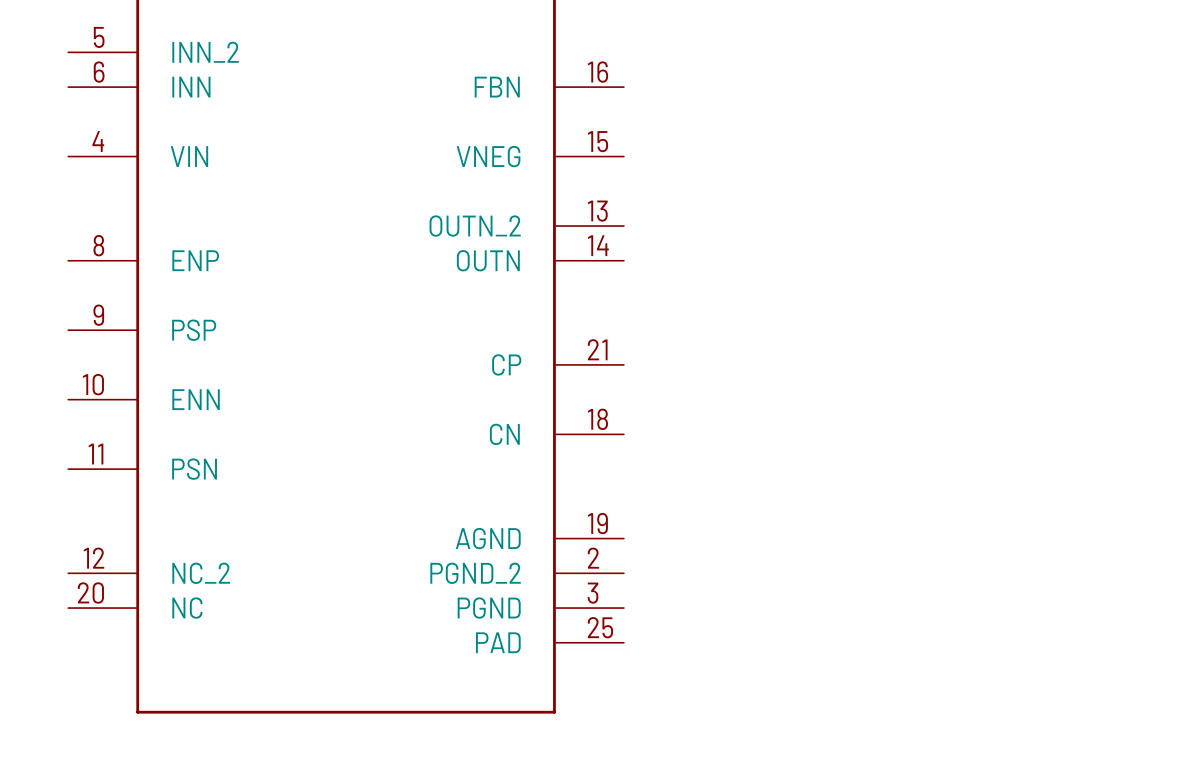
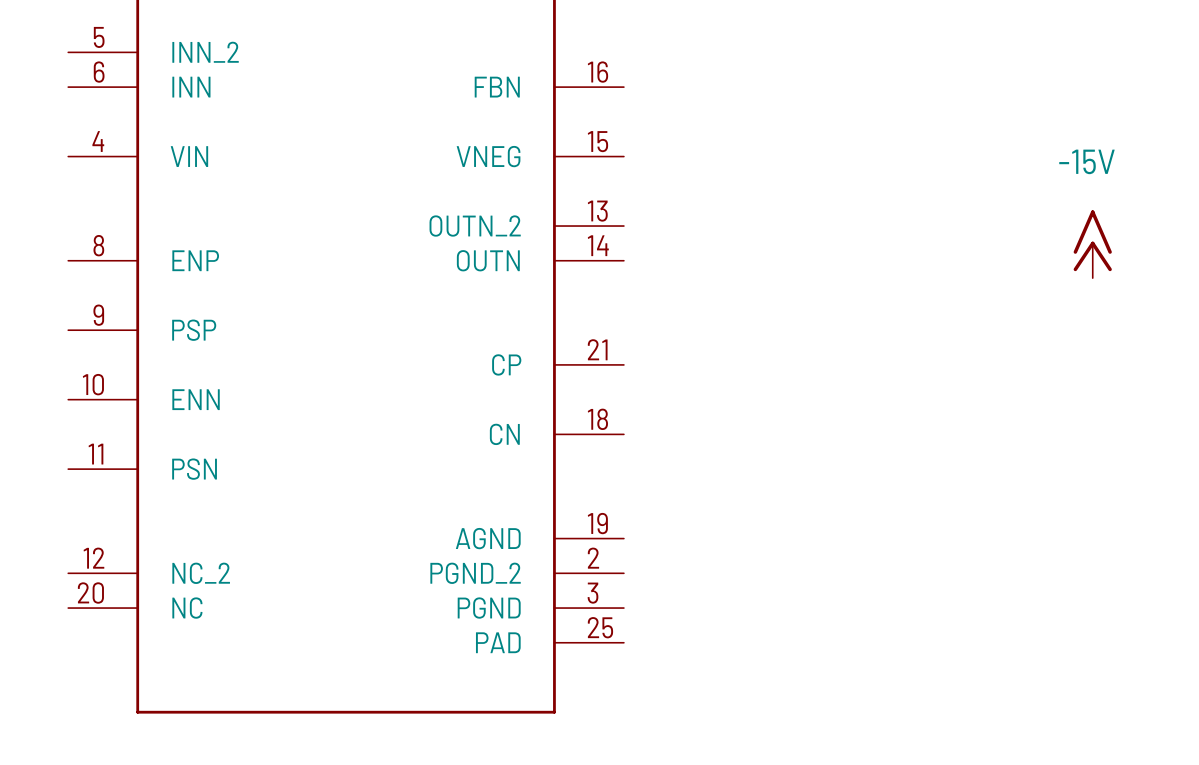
power symbol: none -> -15V (1092, 244)

